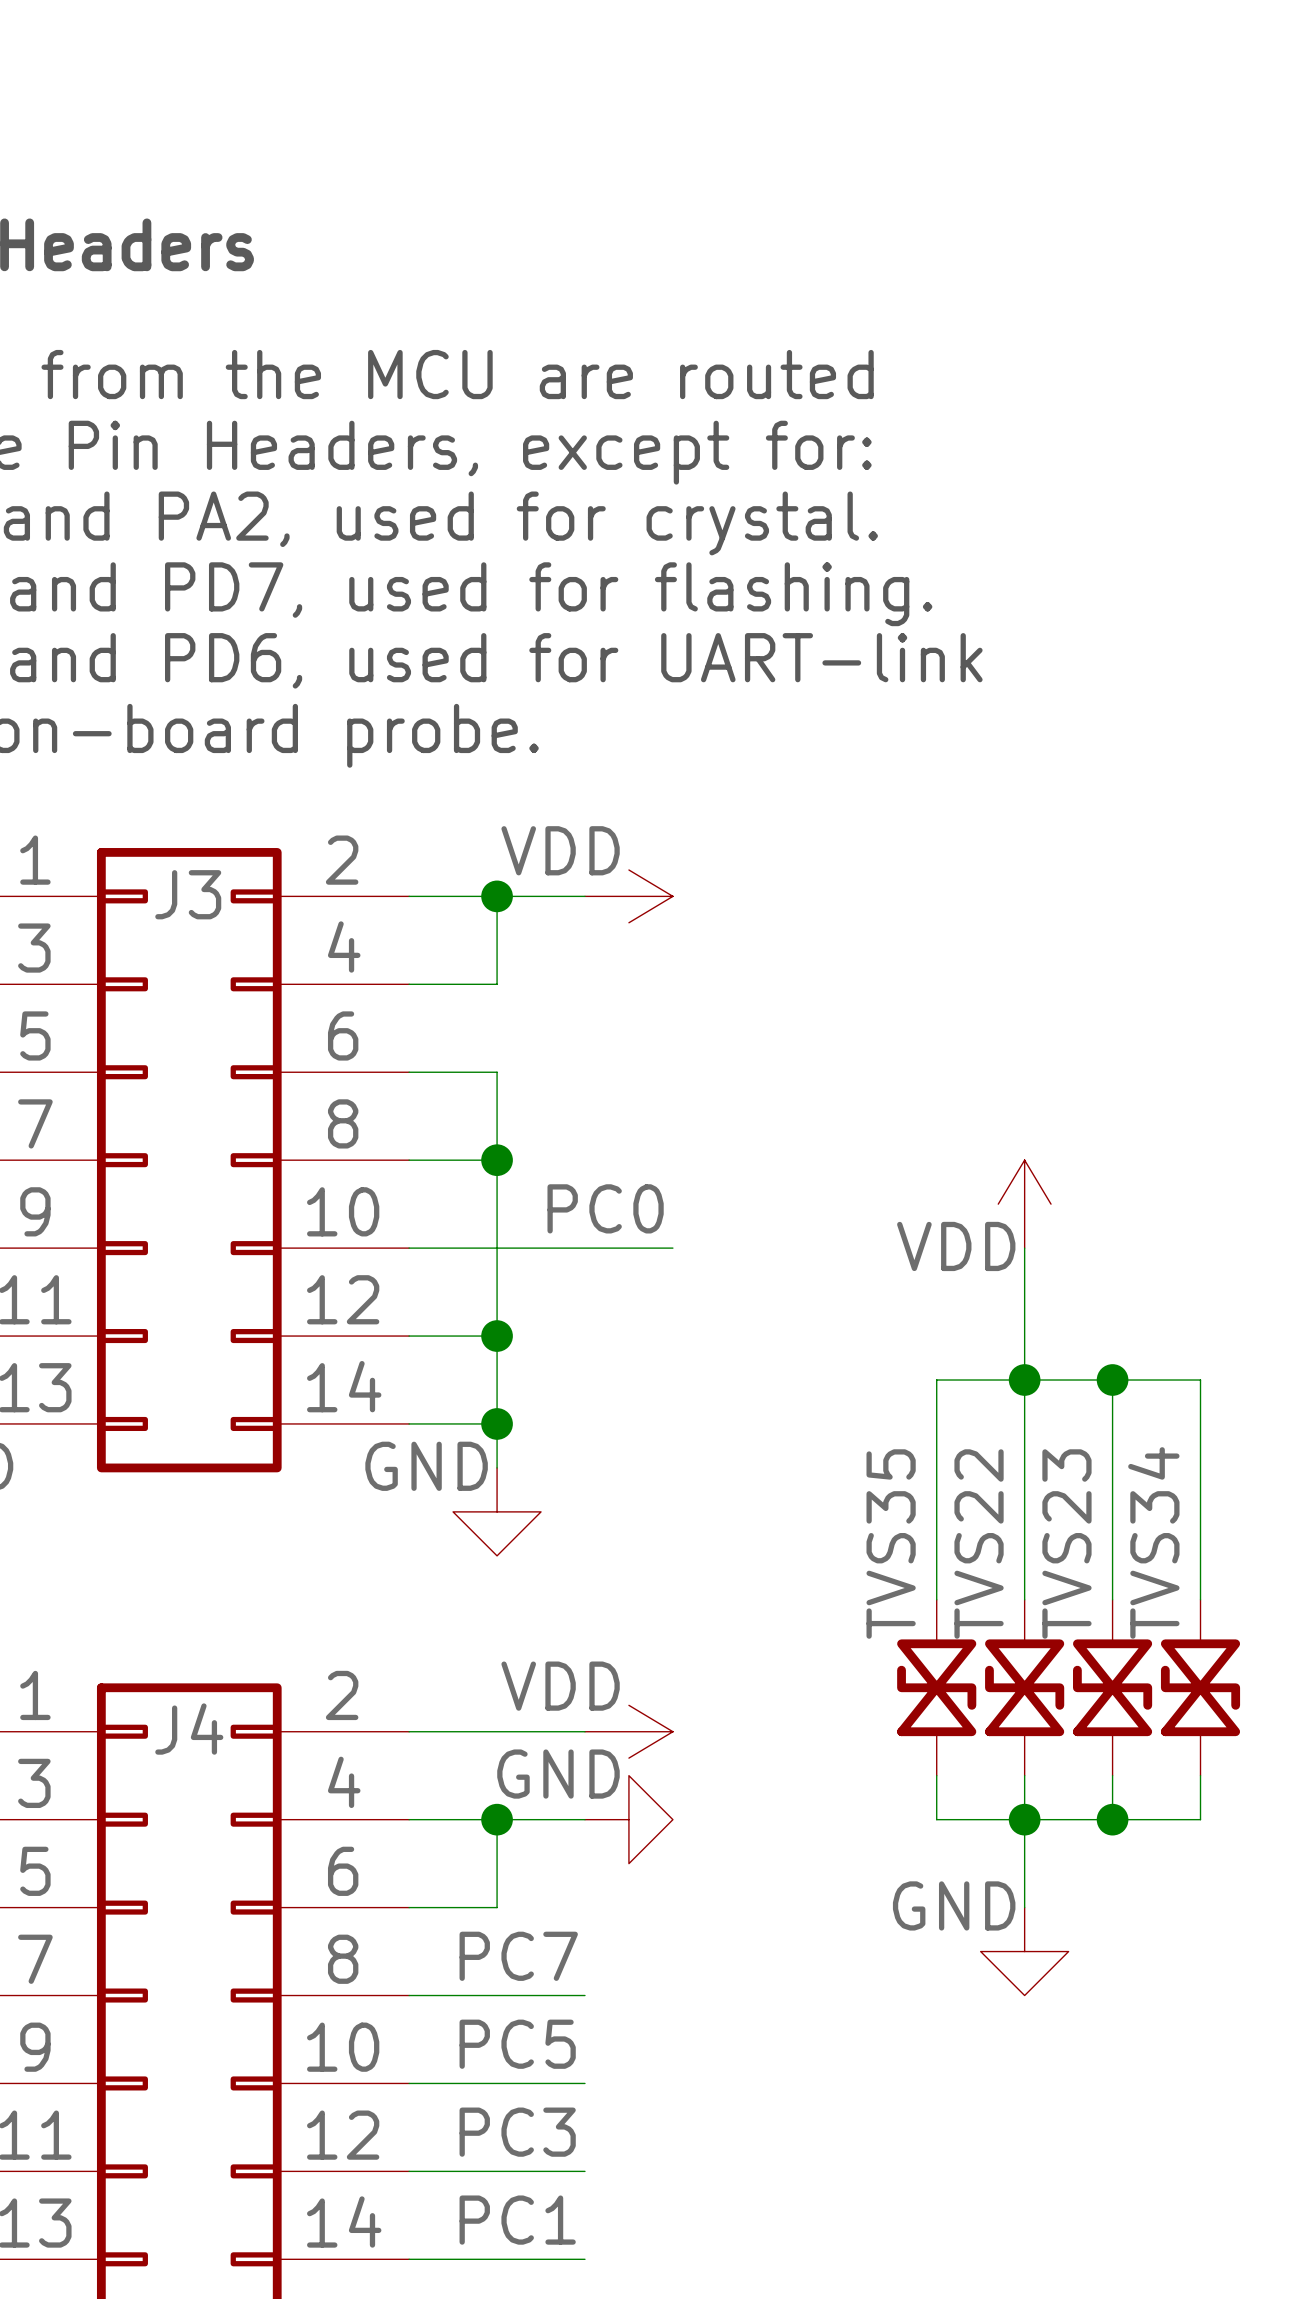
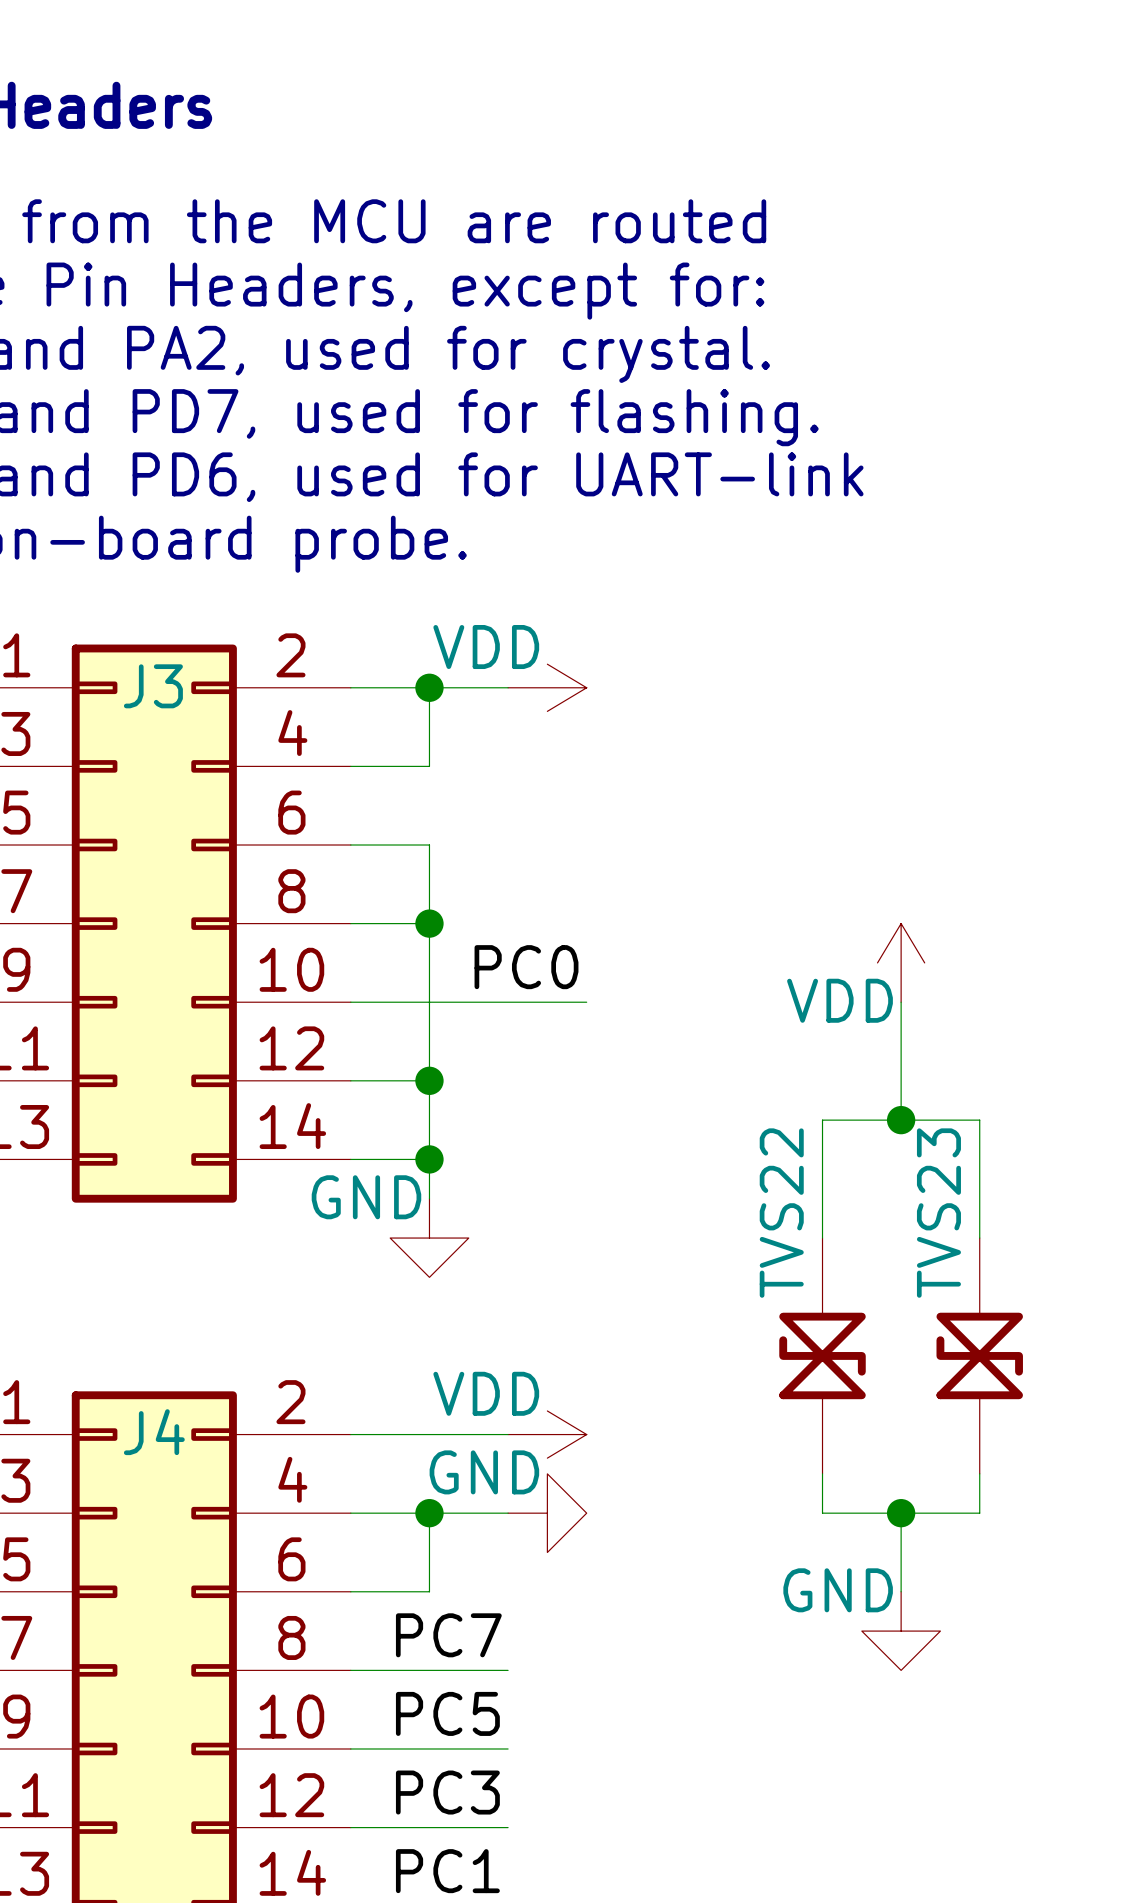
wire: (1024, 1380) (1024, 1599) -> none
wire: (1112, 1380) (1200, 1380) (1200, 1599) -> none
junction: (1112, 1380) -> none
TVS22 symbol: [985, 1599, 1065, 1776] -> [779, 1238, 866, 1474]
TVS23 symbol: [1073, 1599, 1153, 1776] -> [936, 1238, 1023, 1474]
TVS35: (936, 1687) -> none
TVS34: (1200, 1687) -> none
wire: (1024, 1775) (1024, 1819) -> none
wire: (1200, 1775) (1200, 1819) (1112, 1819) -> none
junction: (1112, 1819) -> none

